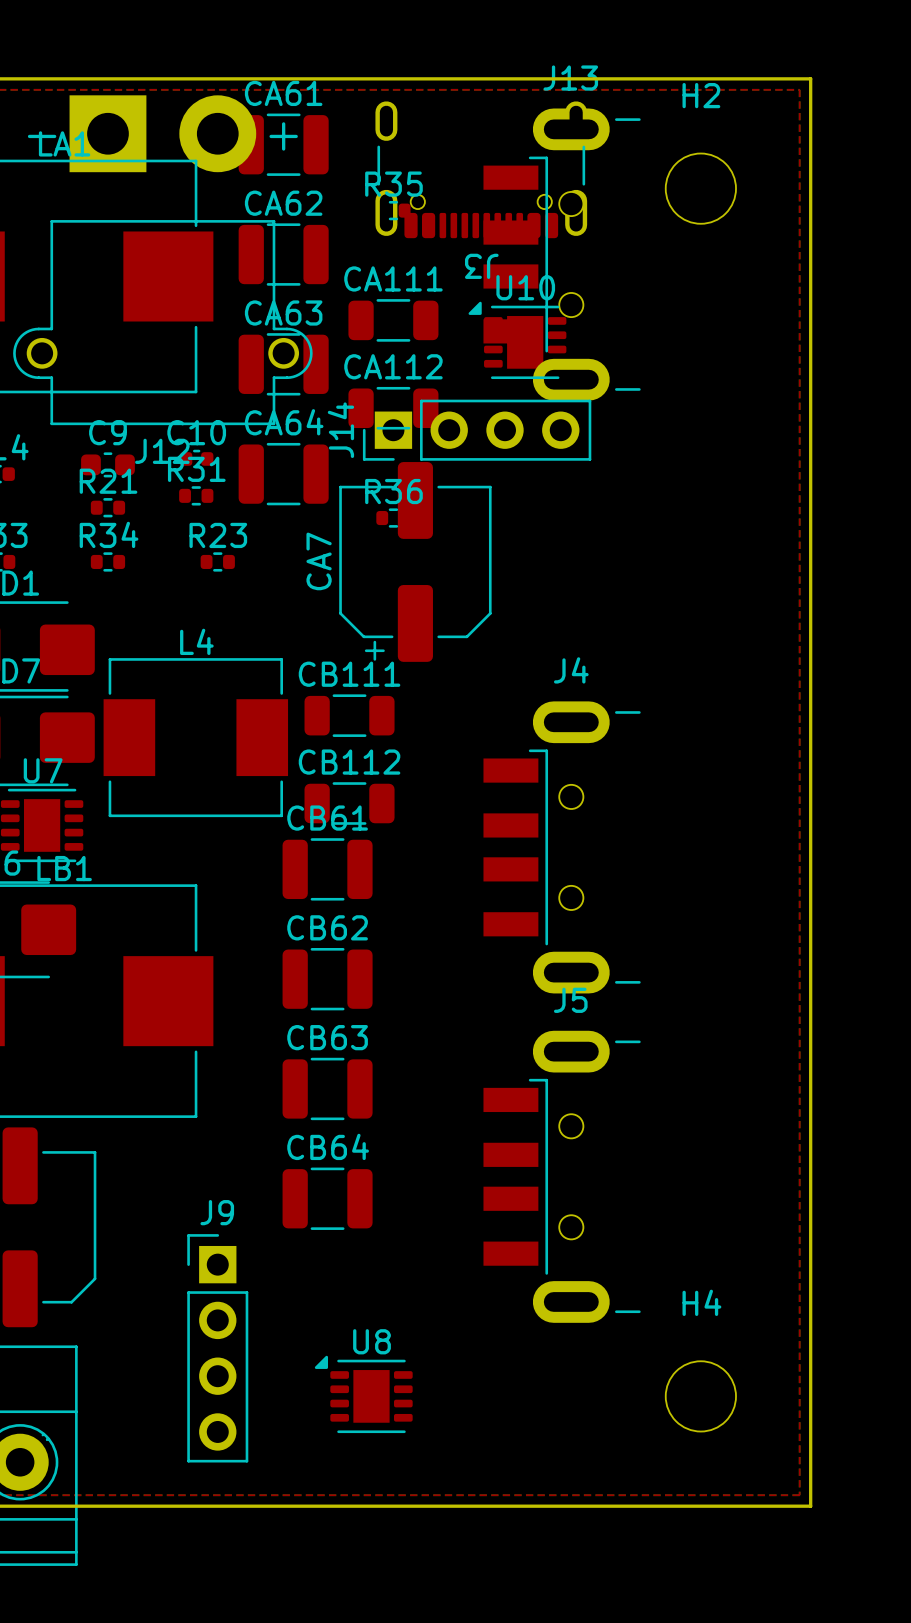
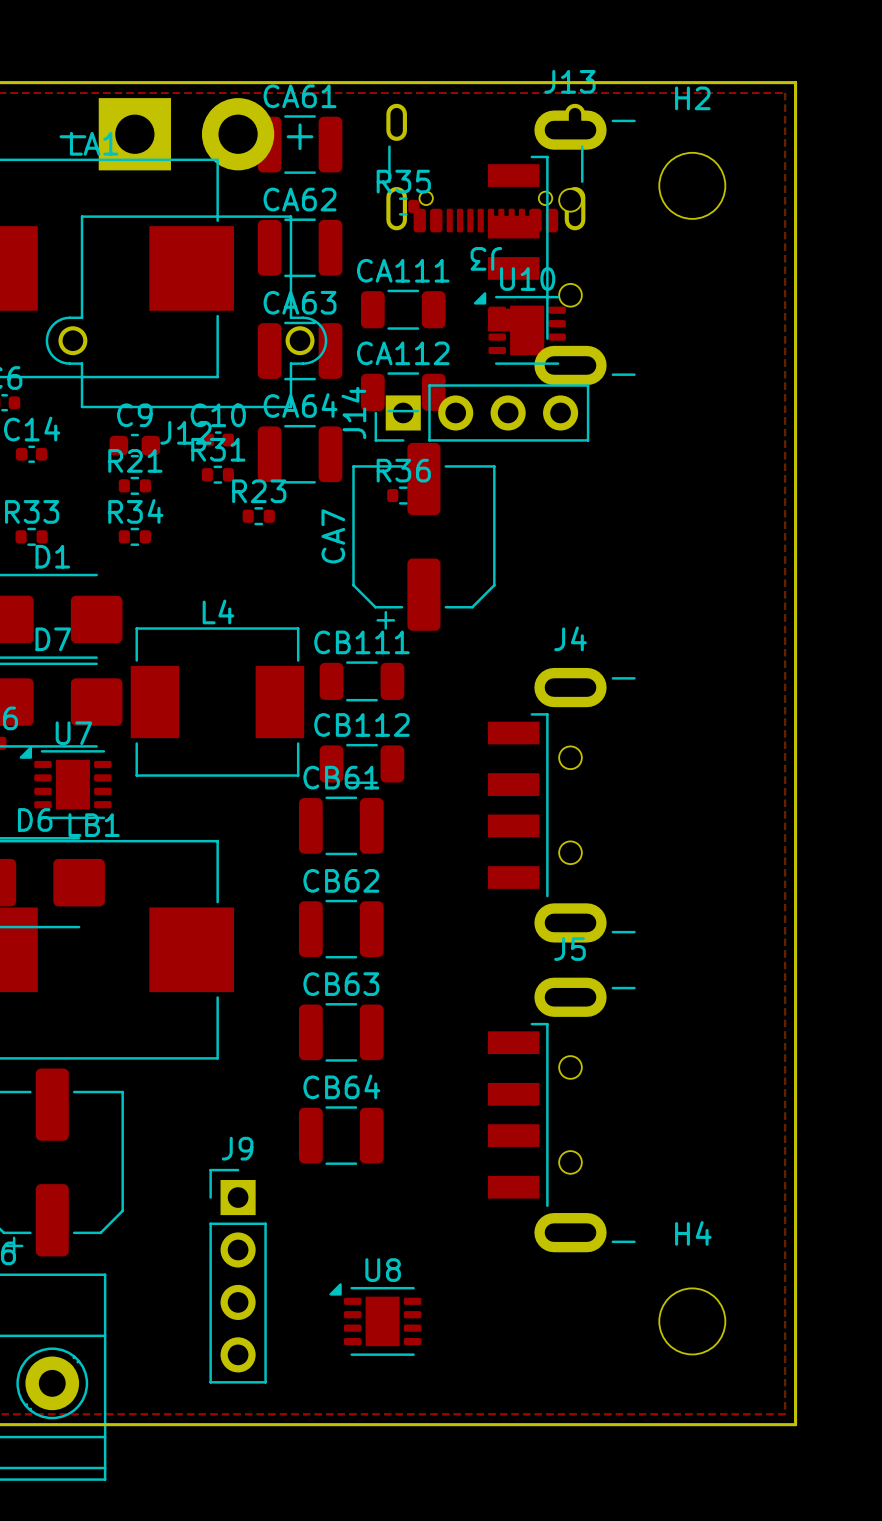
R23 position: (217, 561) -> (258, 516)

